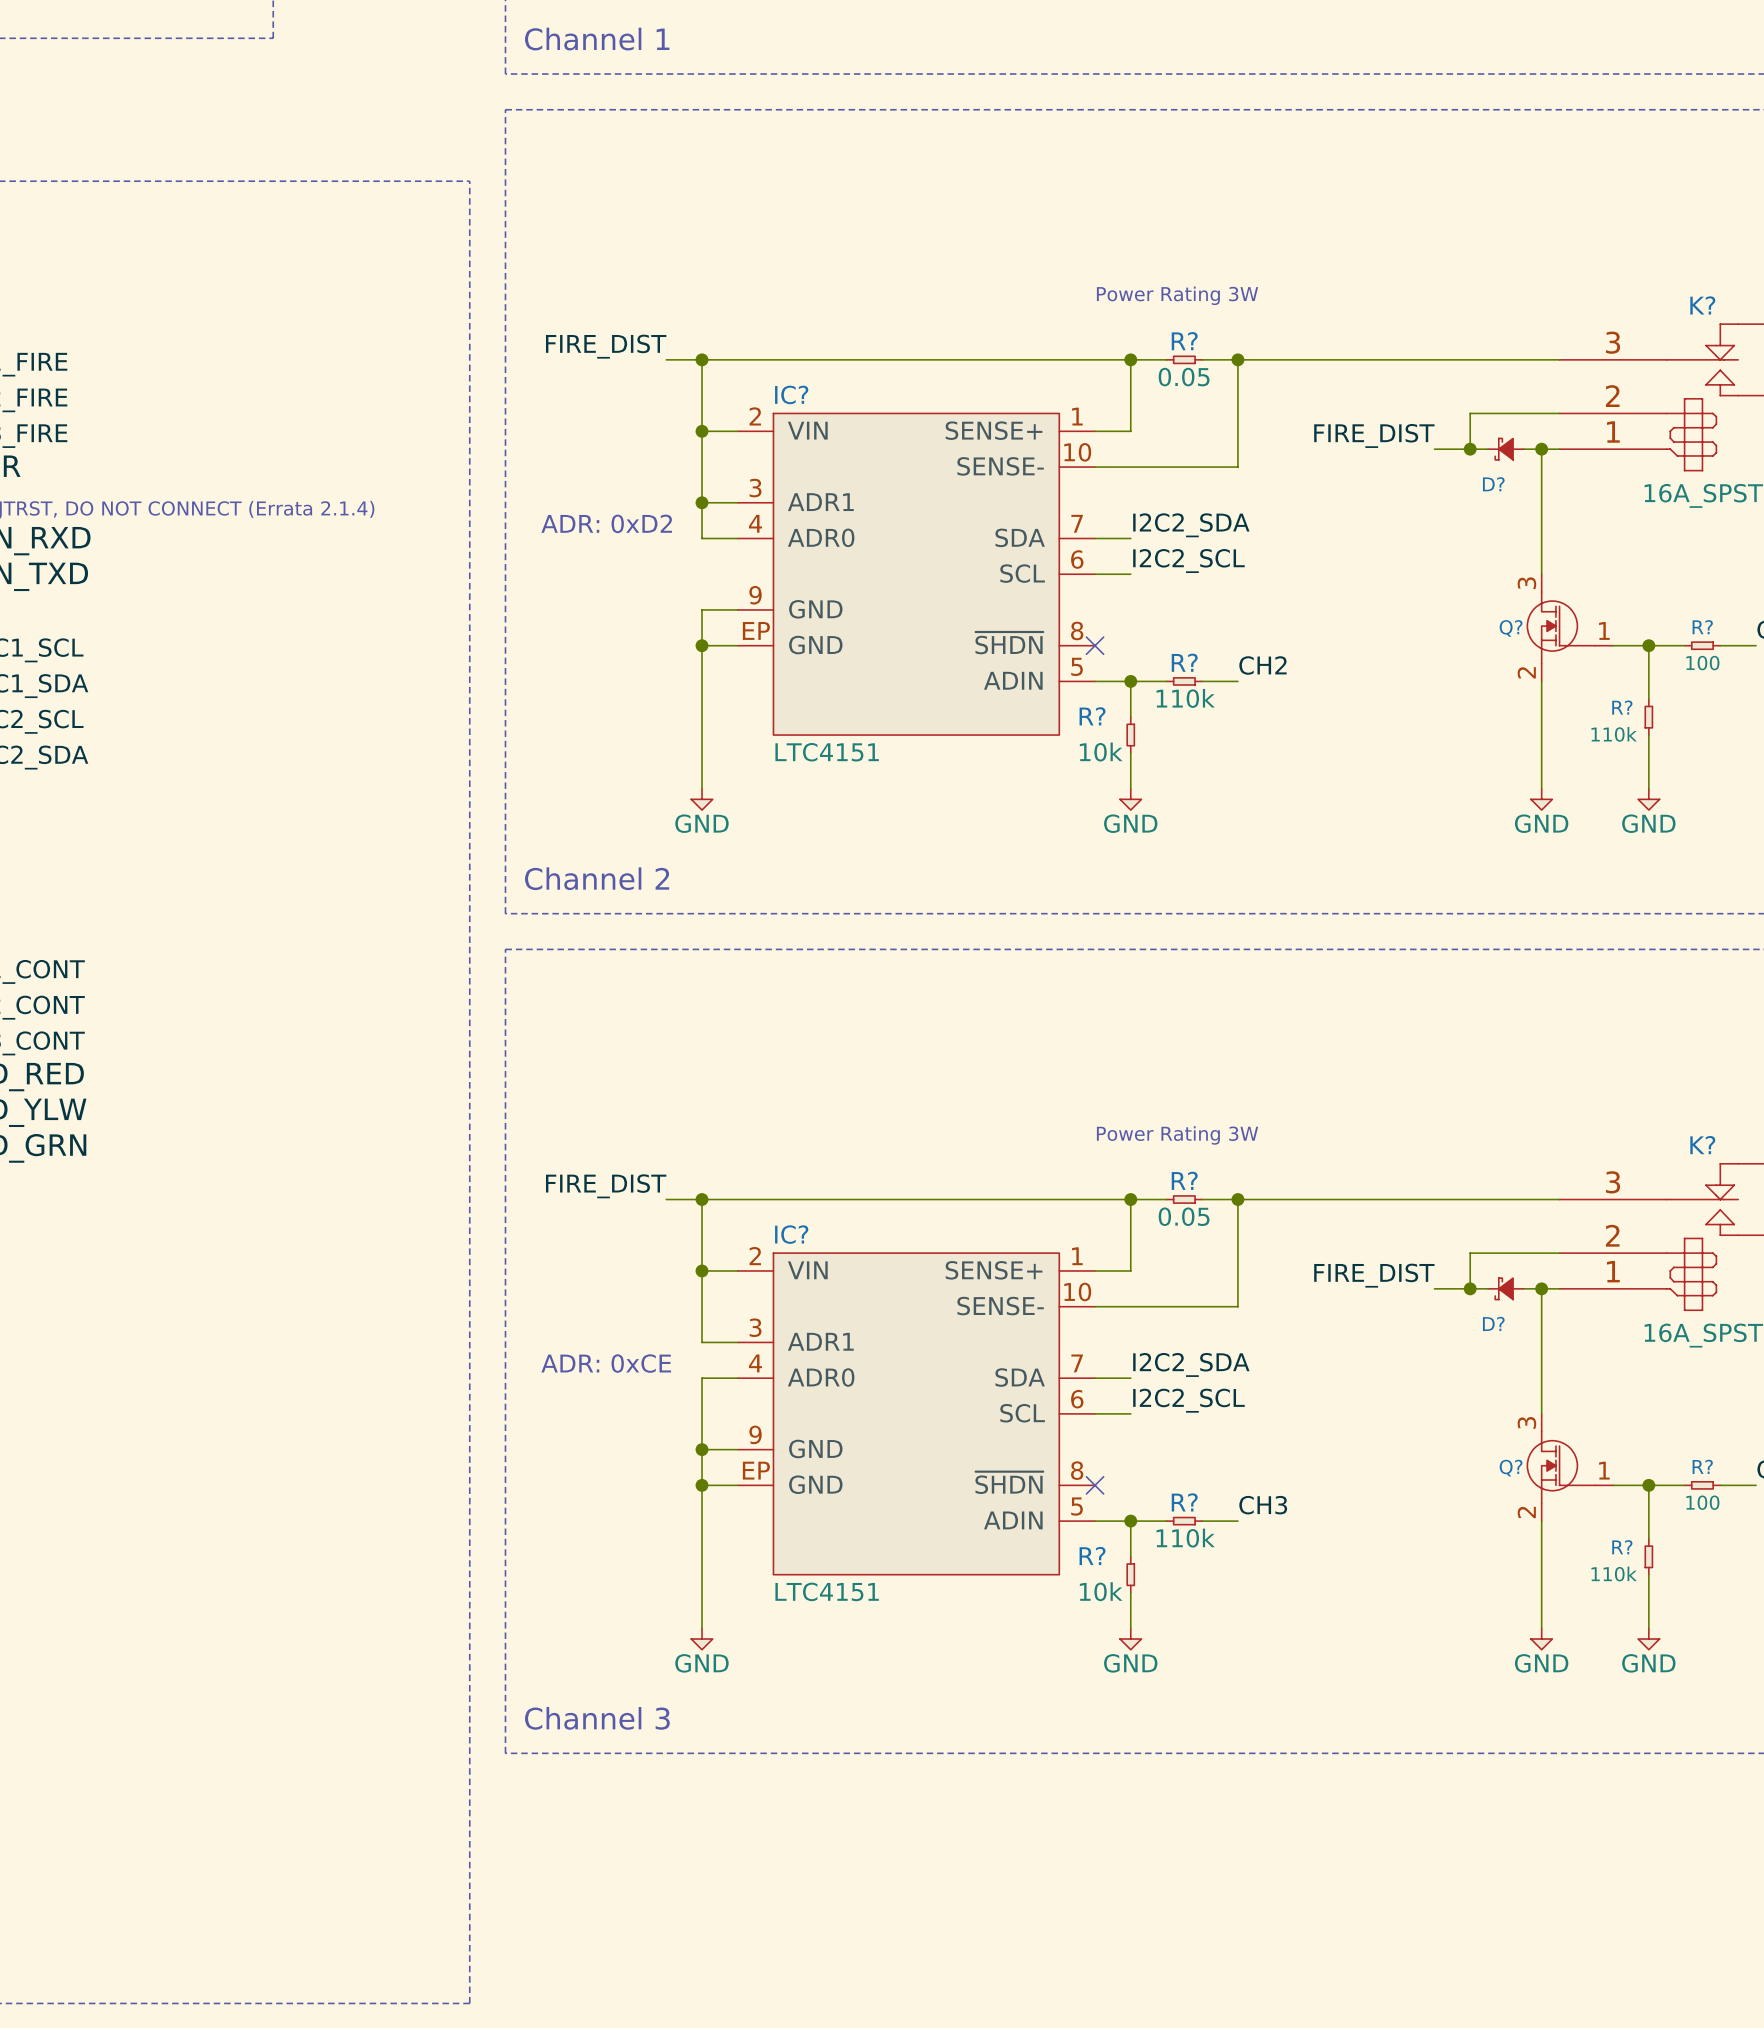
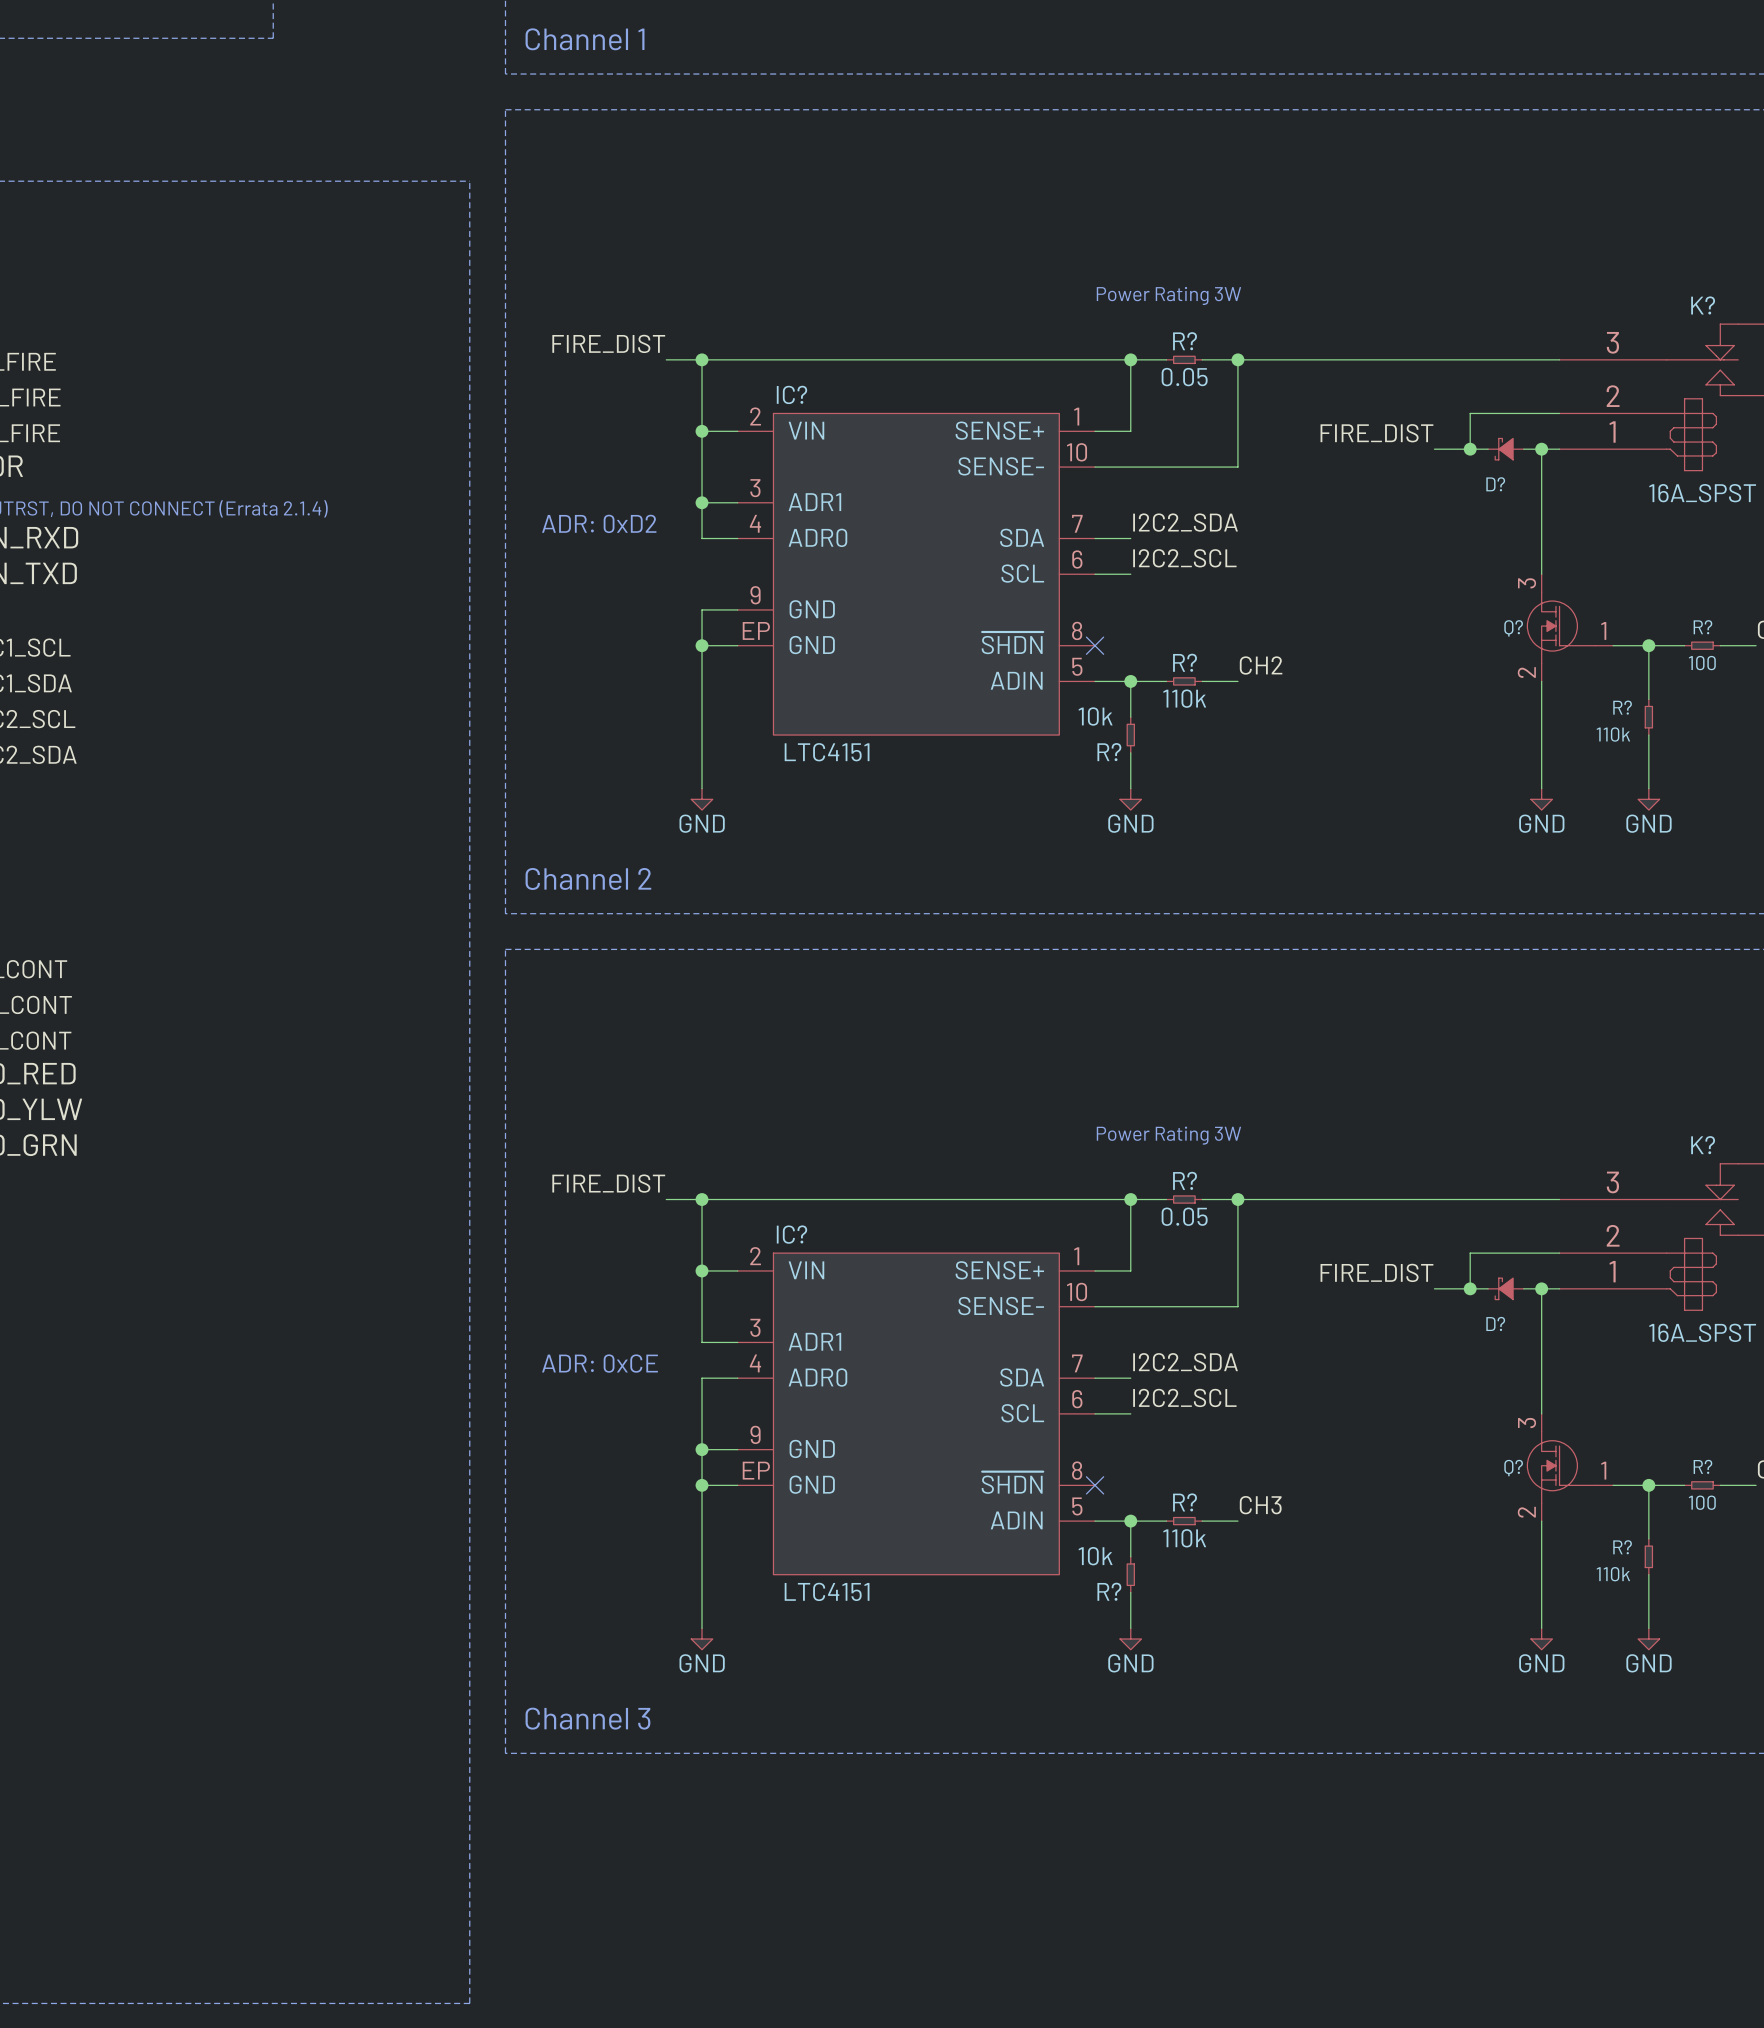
R? name position: R? (1092, 716) -> R? (1109, 752)
R? value position: 10k (1101, 752) -> 10k (1095, 716)
R? name position: R? (1092, 1555) -> R? (1109, 1591)
R? value position: 10k (1101, 1591) -> 10k (1095, 1556)

